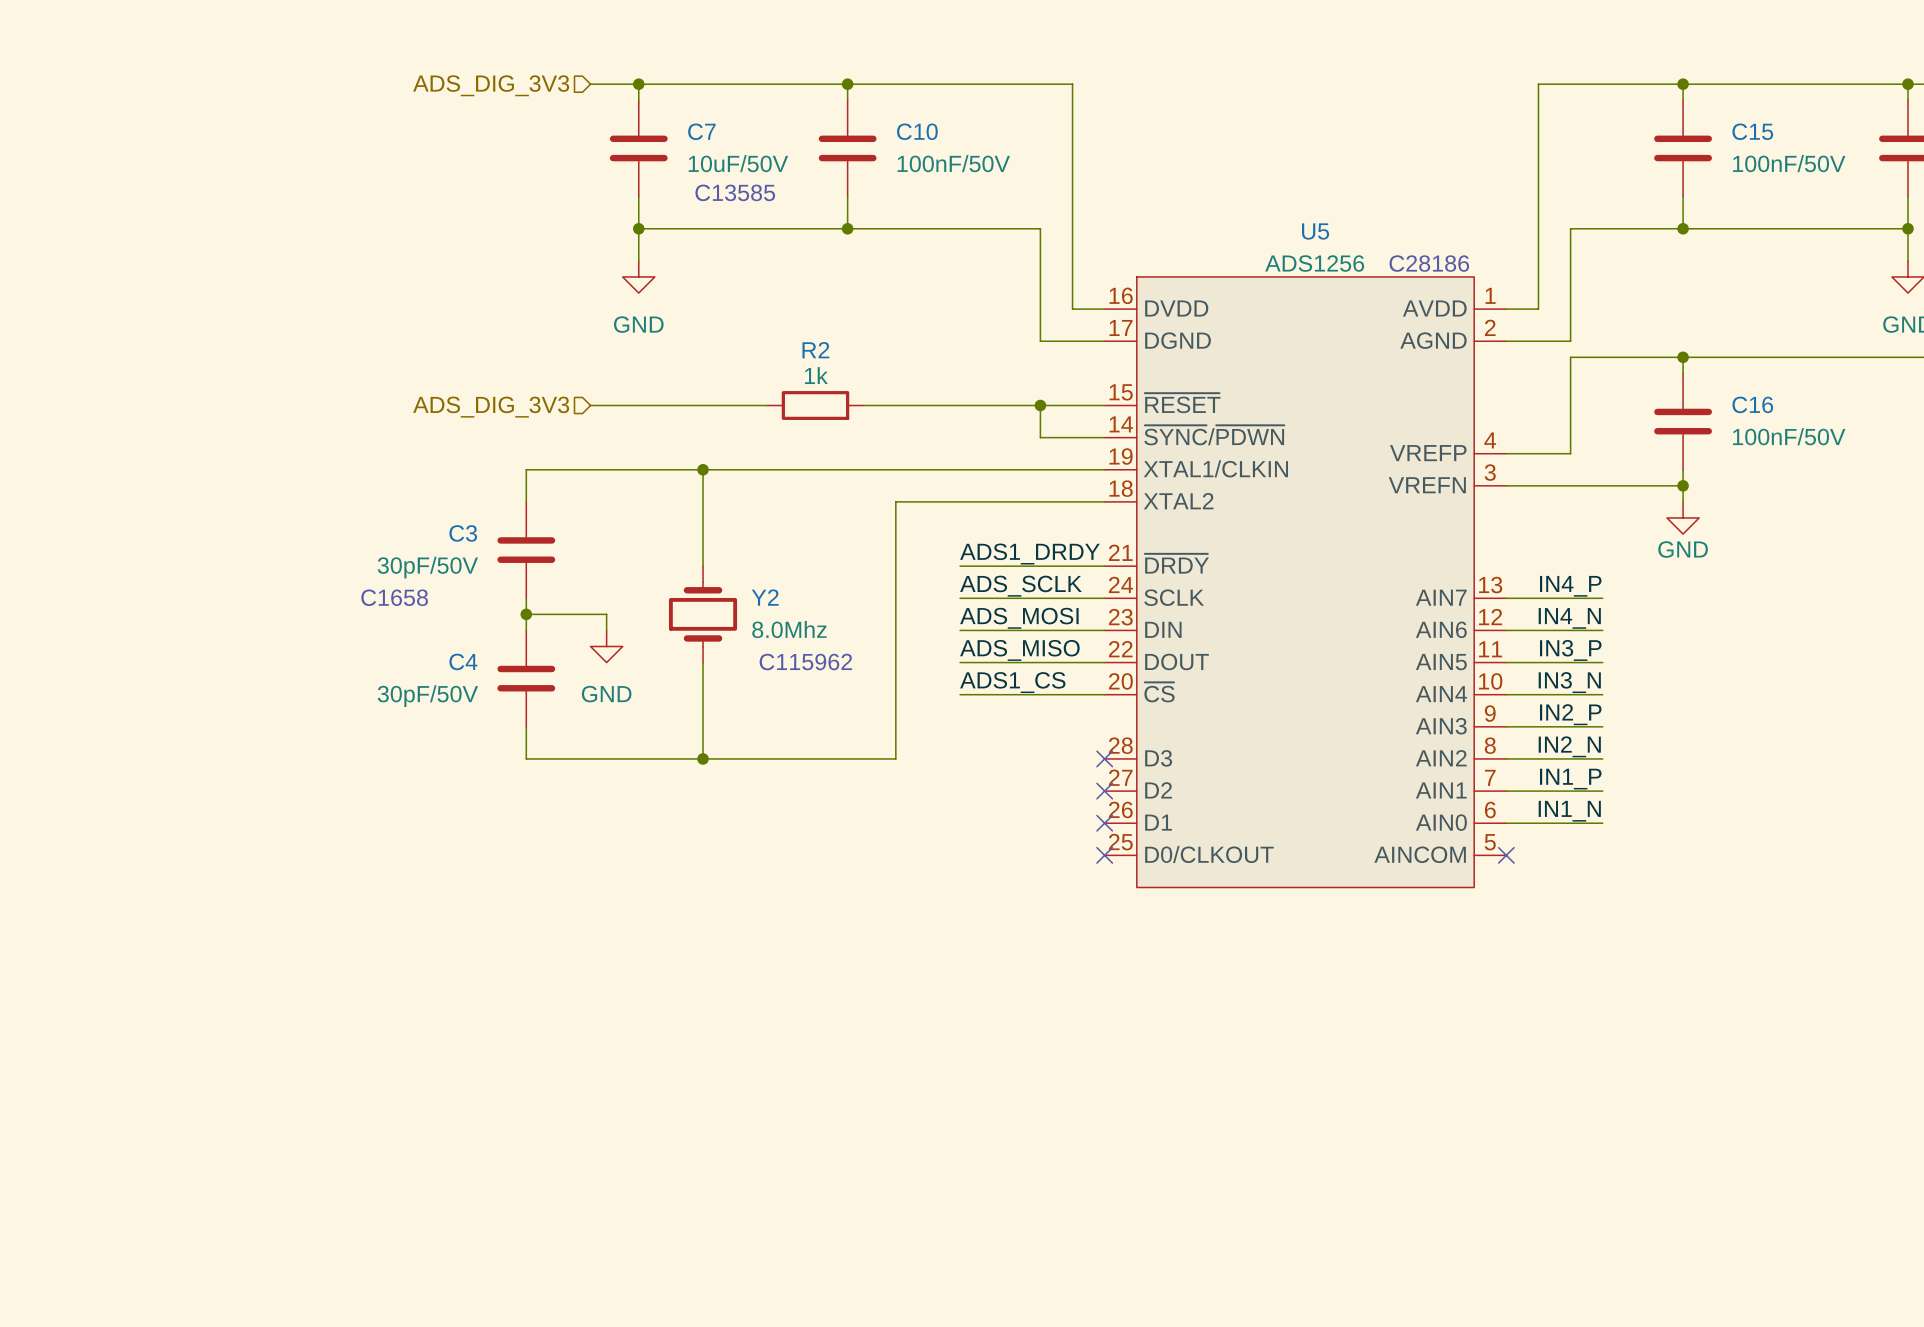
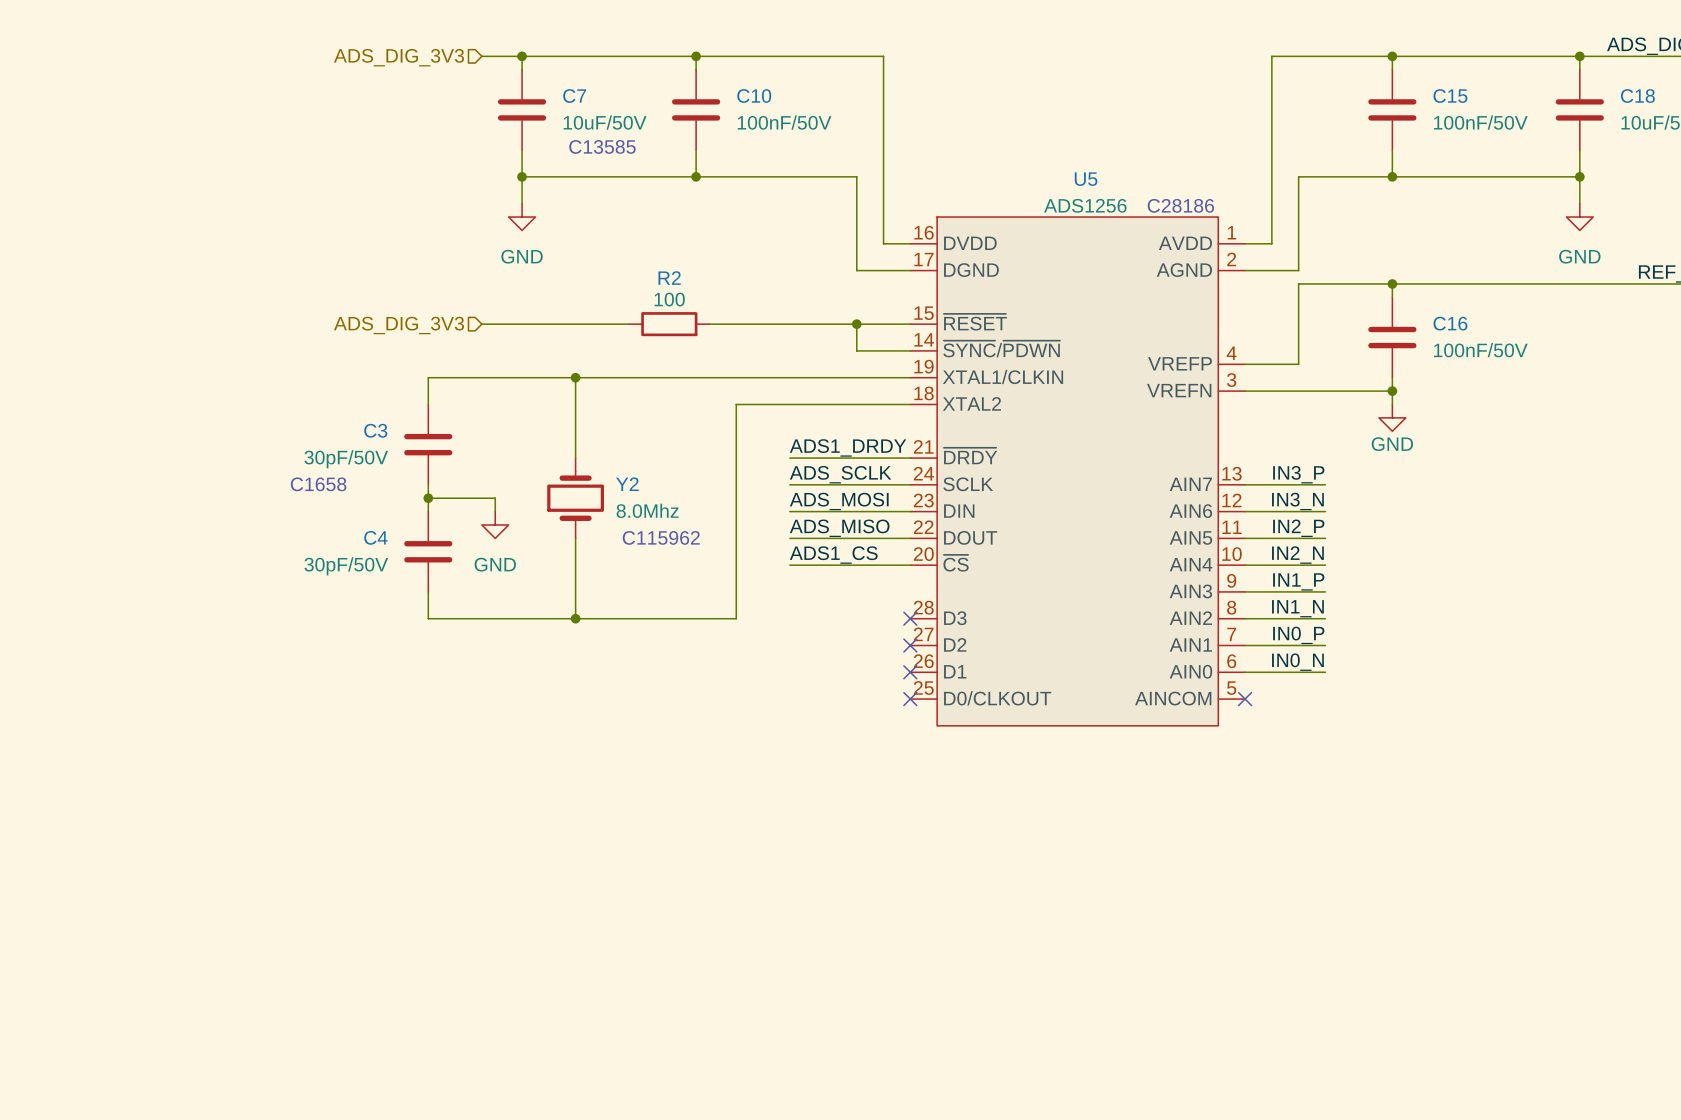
R2 value: 1k (816, 375) -> 100 (669, 299)
label: IN4_P (1570, 586) -> IN3_P (1298, 474)
label: IN4_N (1569, 618) -> IN3_N (1297, 501)
label: IN3_P (1570, 650) -> IN2_P (1298, 528)
label: IN3_N (1569, 682) -> IN2_N (1297, 555)
label: IN2_P (1570, 714) -> IN1_P (1298, 581)
label: IN2_N (1569, 746) -> IN1_N (1297, 608)
label: IN1_P (1570, 779) -> IN0_P (1298, 635)
label: IN1_N (1569, 811) -> IN0_N (1297, 662)

